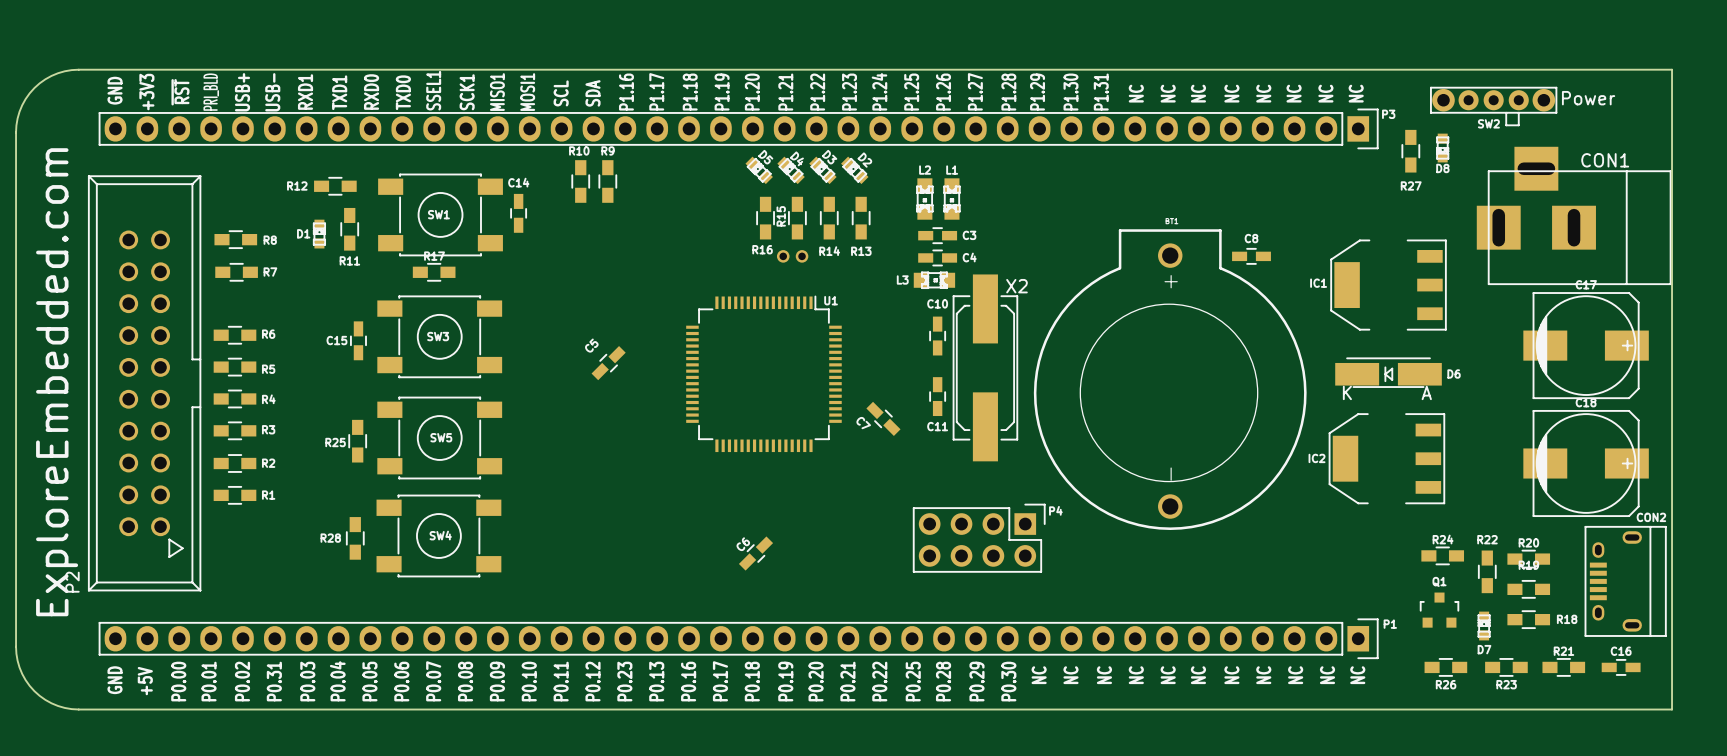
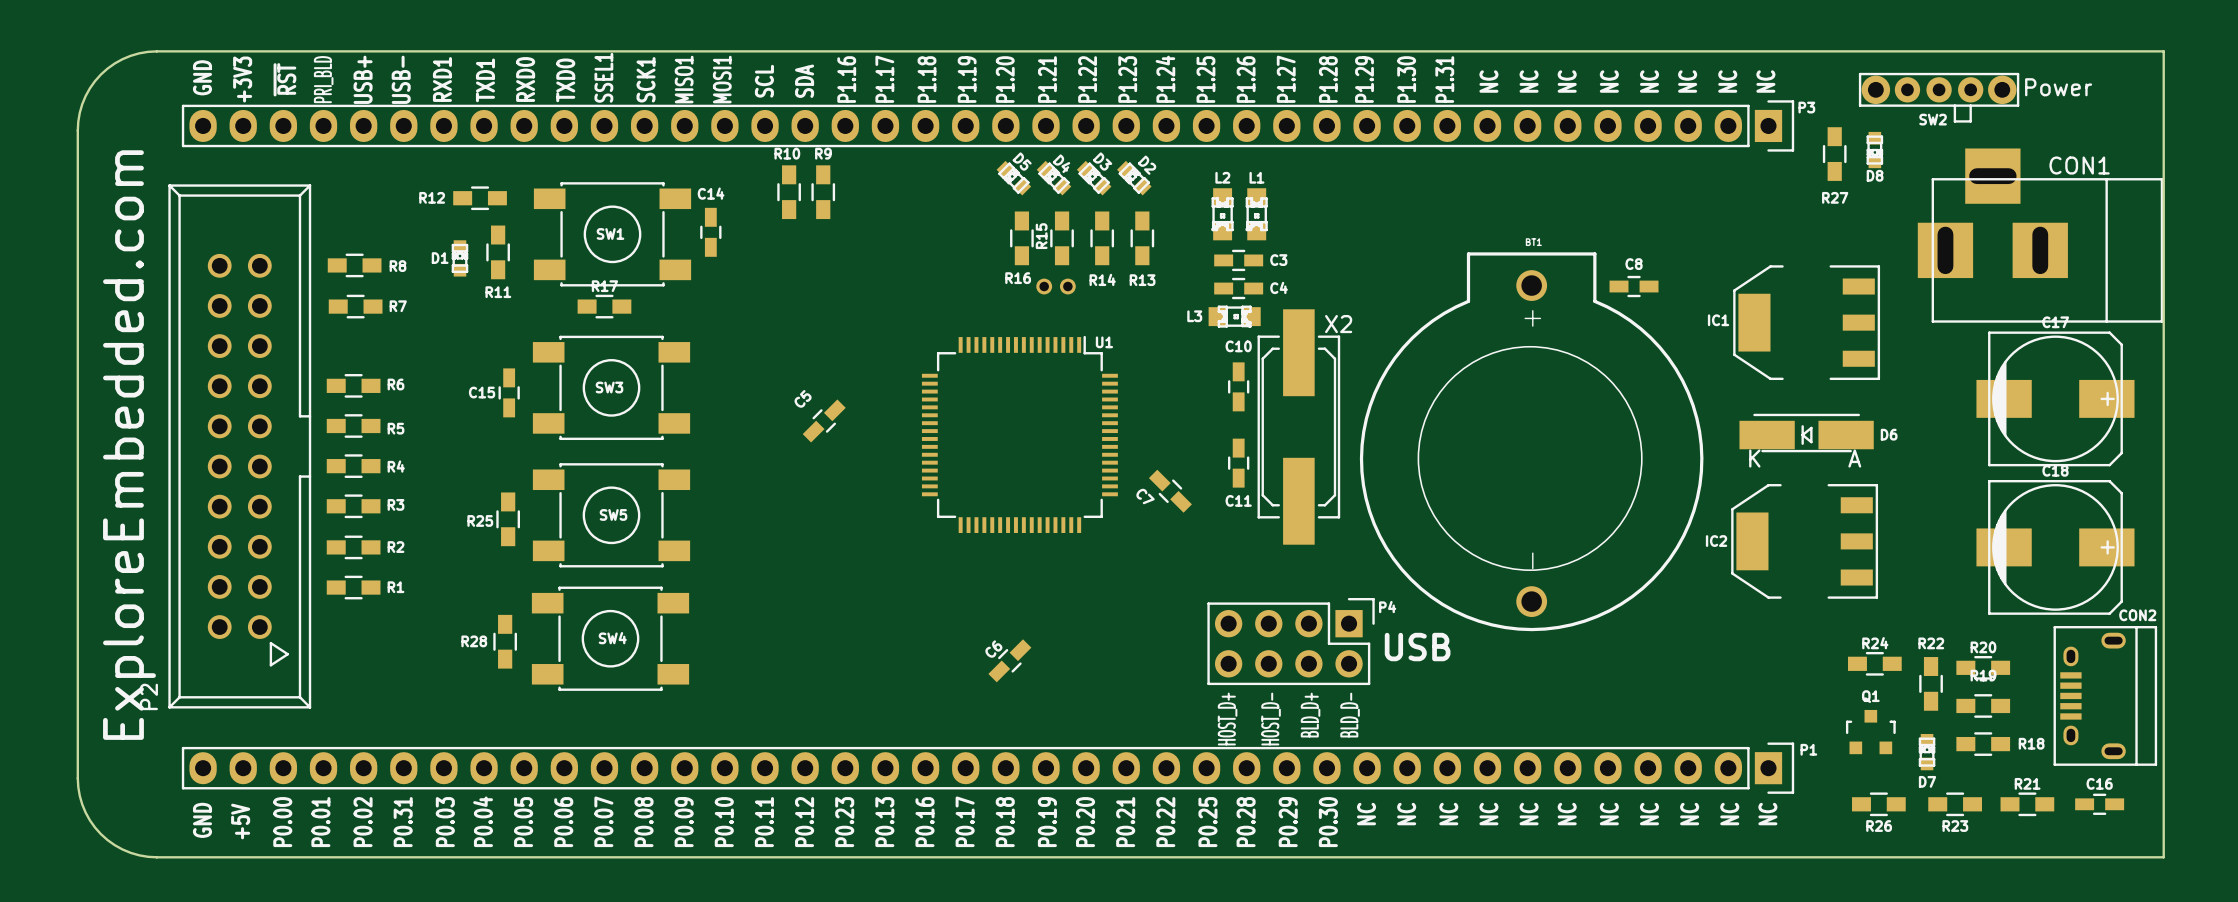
text: none -> USB (1417, 647)
text: none -> BLD_D+ (1310, 715)
text: none -> BLD_D- (1350, 715)
text: none -> HOST_D+ (1227, 719)
text: none -> HOST_D- (1271, 719)

